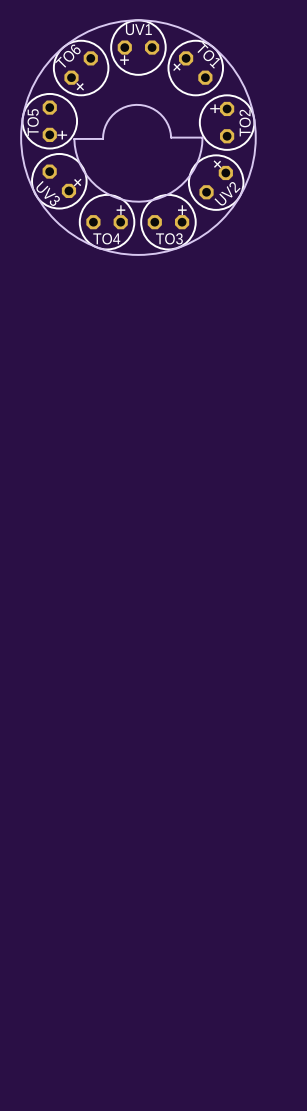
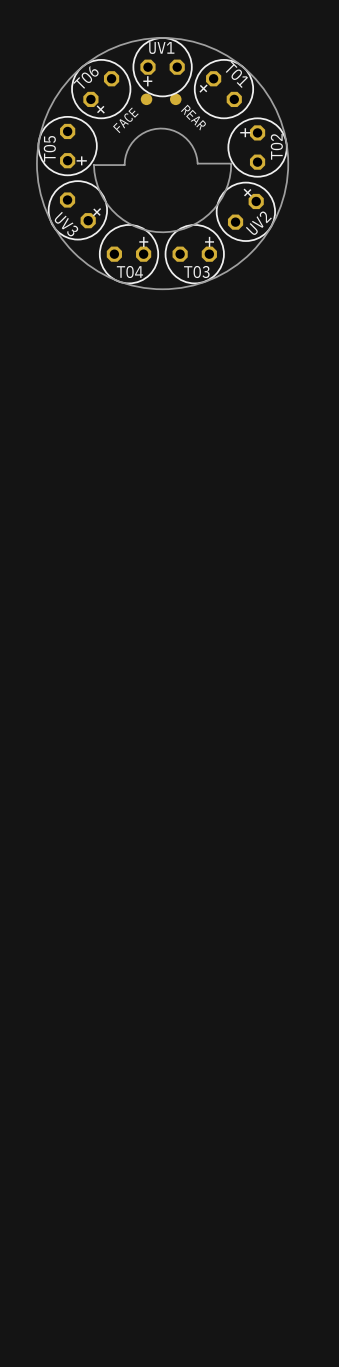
FACE: none -> (146, 99)
REAR: none -> (175, 99)

